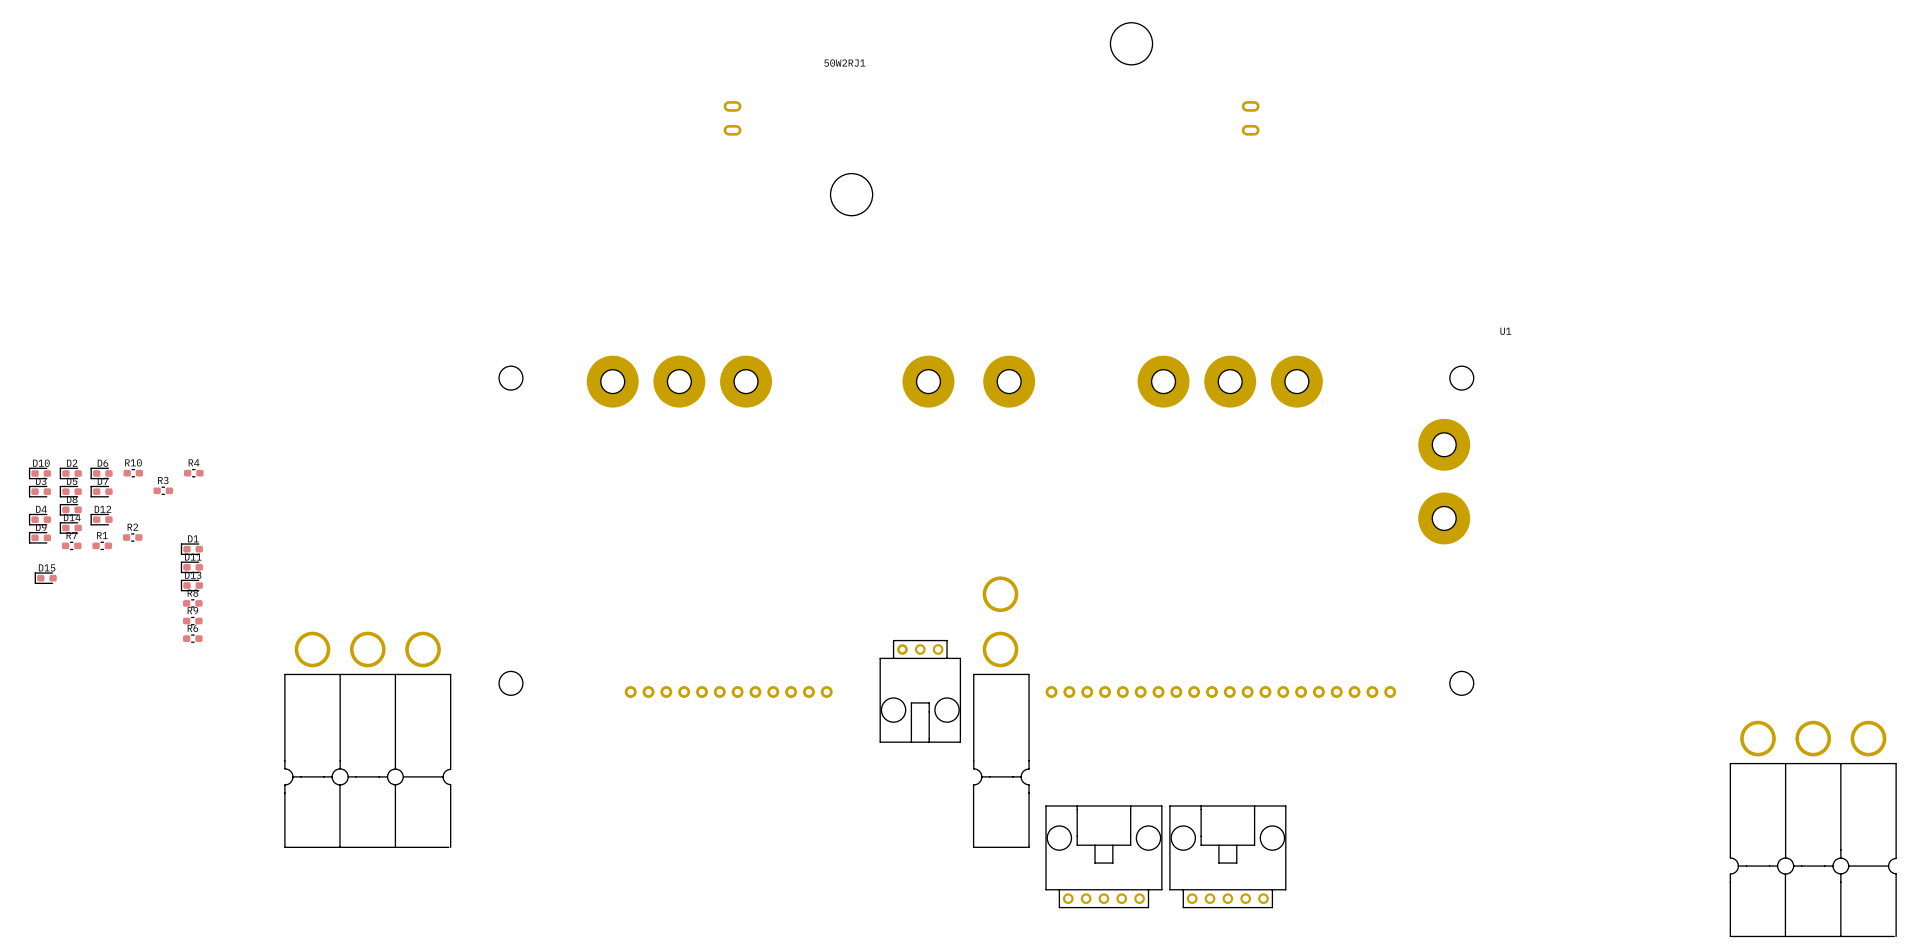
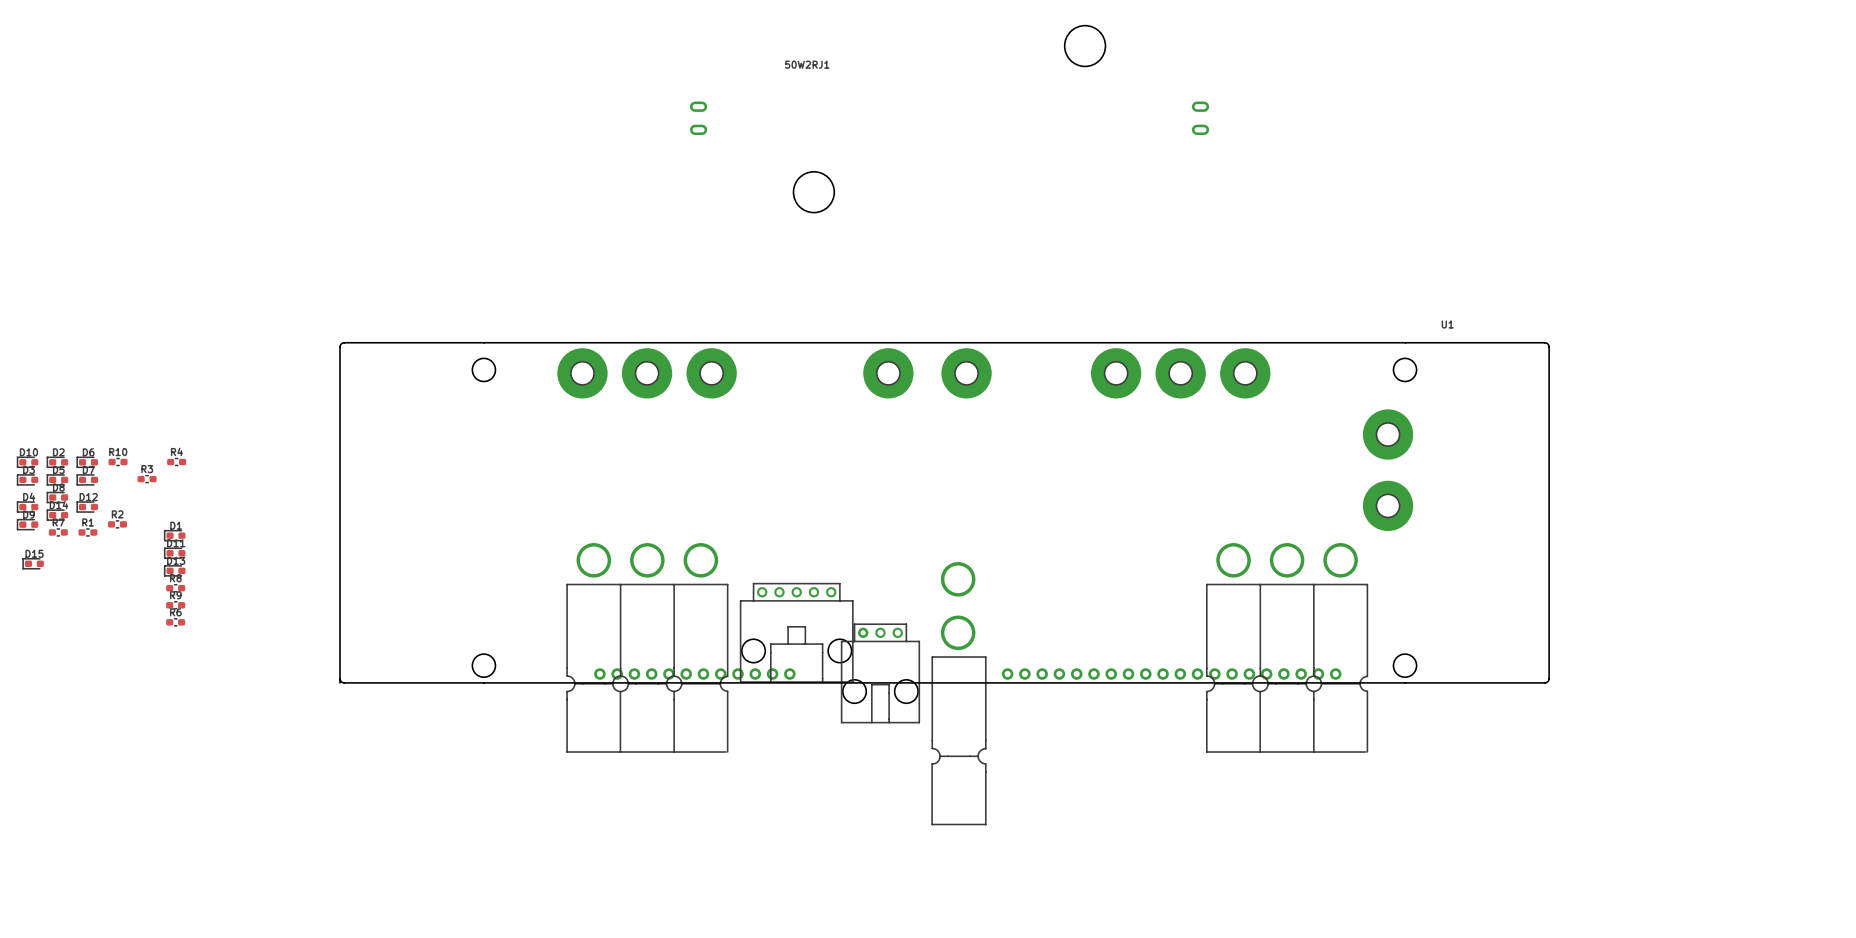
part: none -> (796, 632)
part: none -> (647, 647)
part: none -> (1287, 647)
board edge: none -> (340, 678) (344, 682) (1545, 682) (1549, 678) (1548, 345) (1544, 342) (343, 342) (340, 347) (340, 682)
part: (367, 739) -> none
part: (1813, 828) -> none
part: (1103, 856) -> none
part: (1227, 856) -> none

